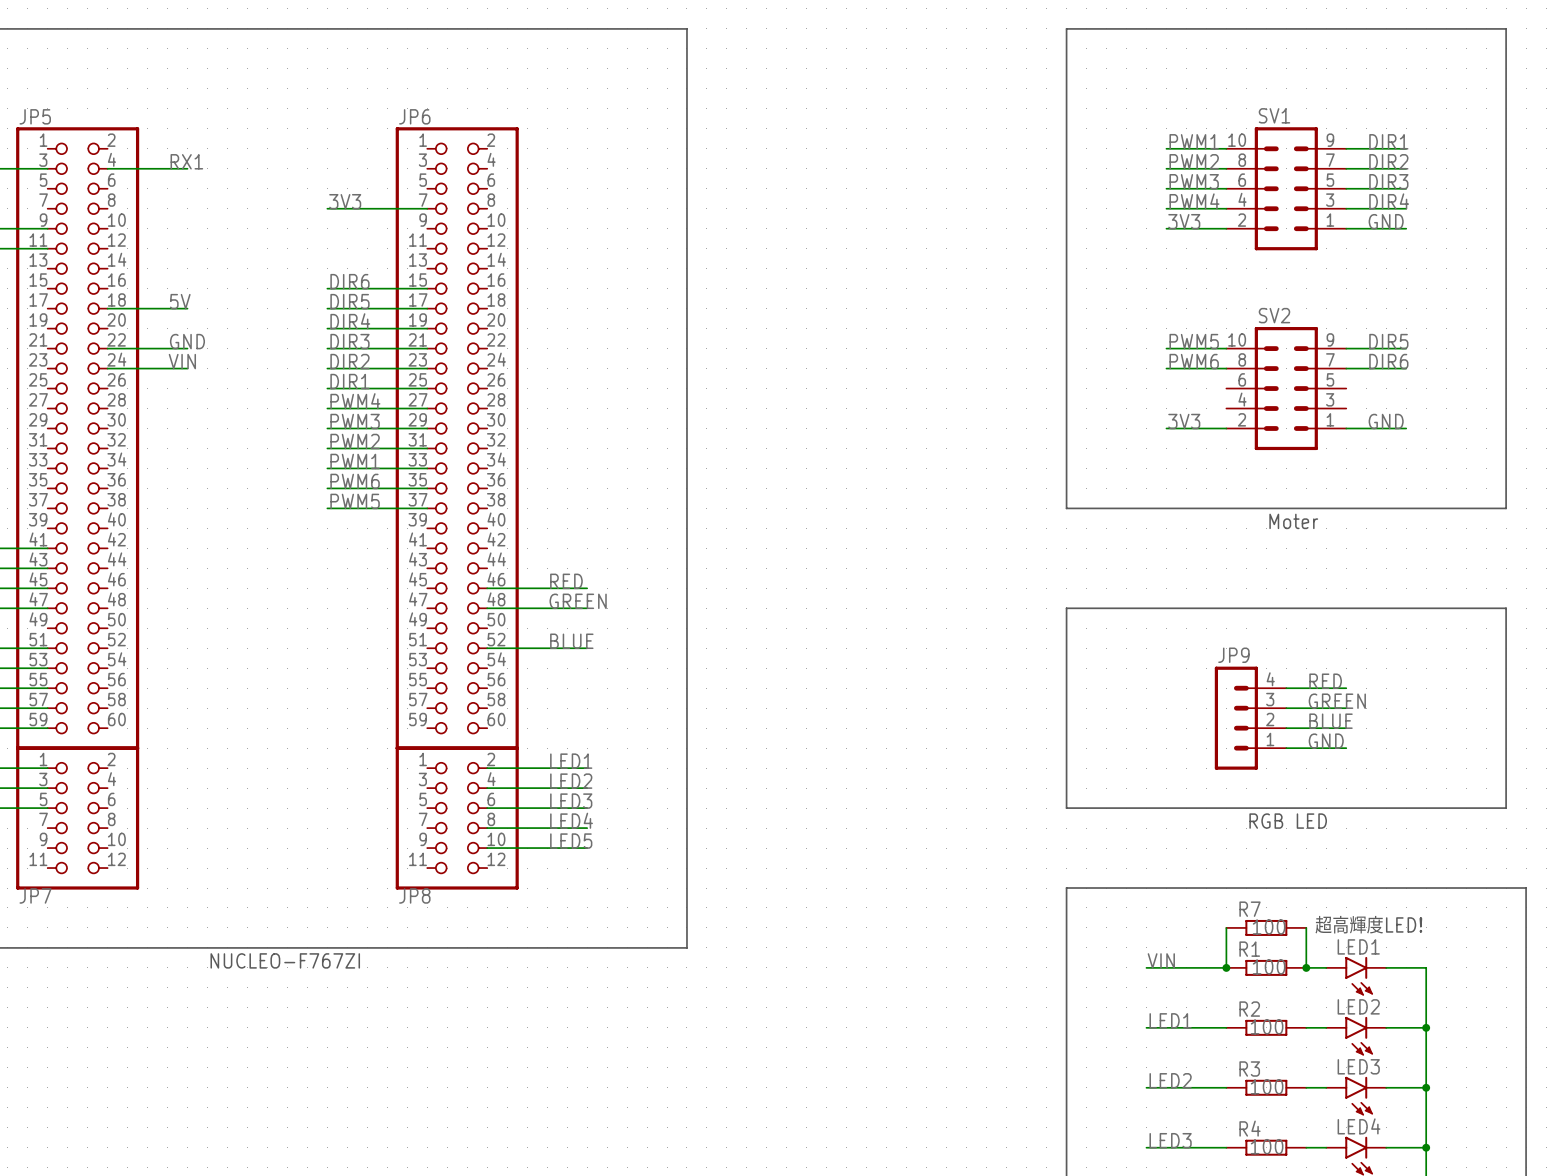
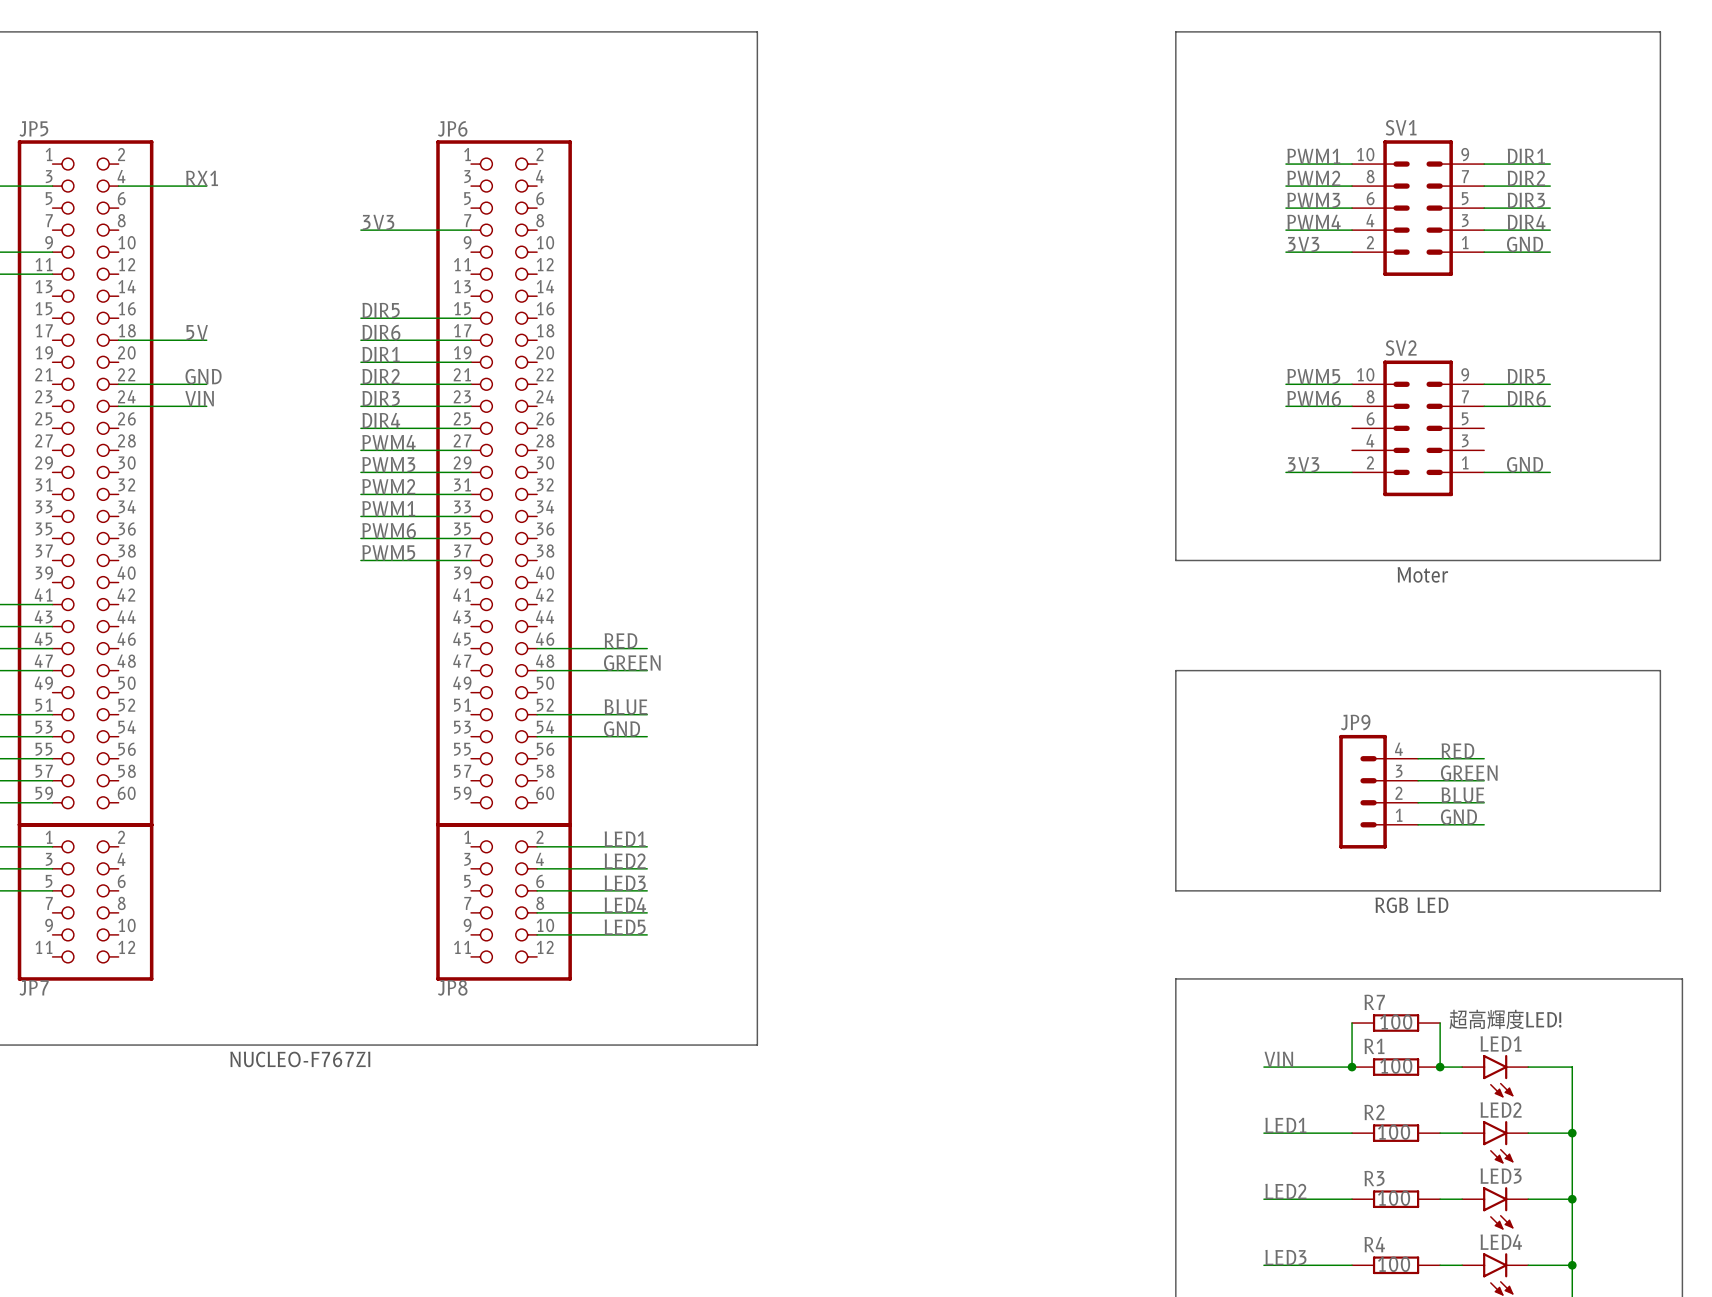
label: DIR6 (349, 281) -> DIR5 (381, 310)
label: DIR5 (349, 301) -> DIR6 (381, 332)
label: DIR4 (350, 321) -> DIR1 (381, 354)
label: DIR3 (349, 341) -> DIR2 (381, 376)
label: DIR2 (349, 361) -> DIR3 (381, 398)
label: DIR1 (349, 381) -> DIR4 (381, 420)
label: none -> GND (622, 729)
wire: none -> (537, 736) (647, 736)

